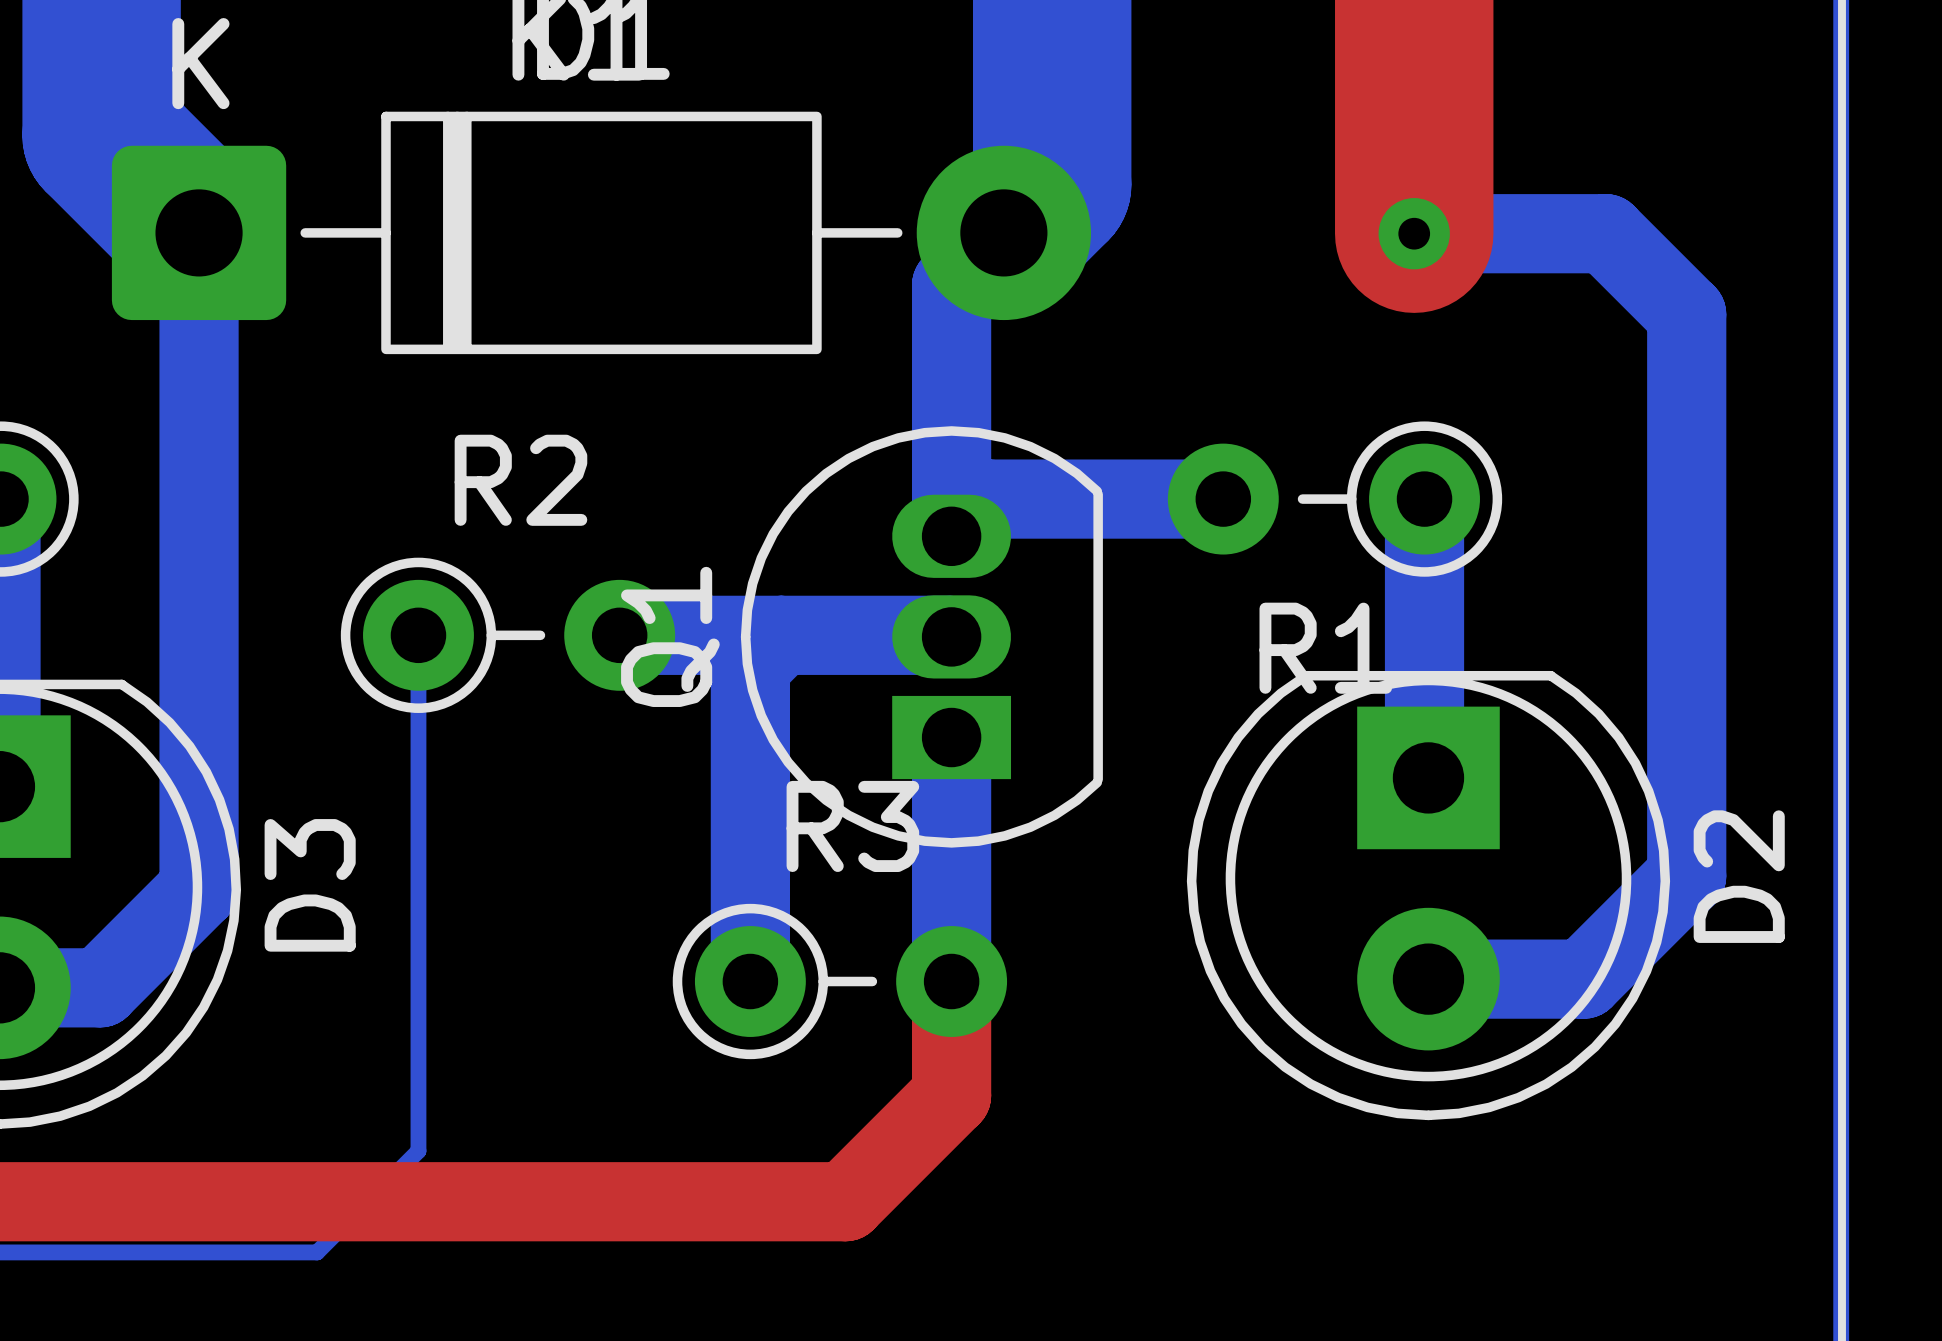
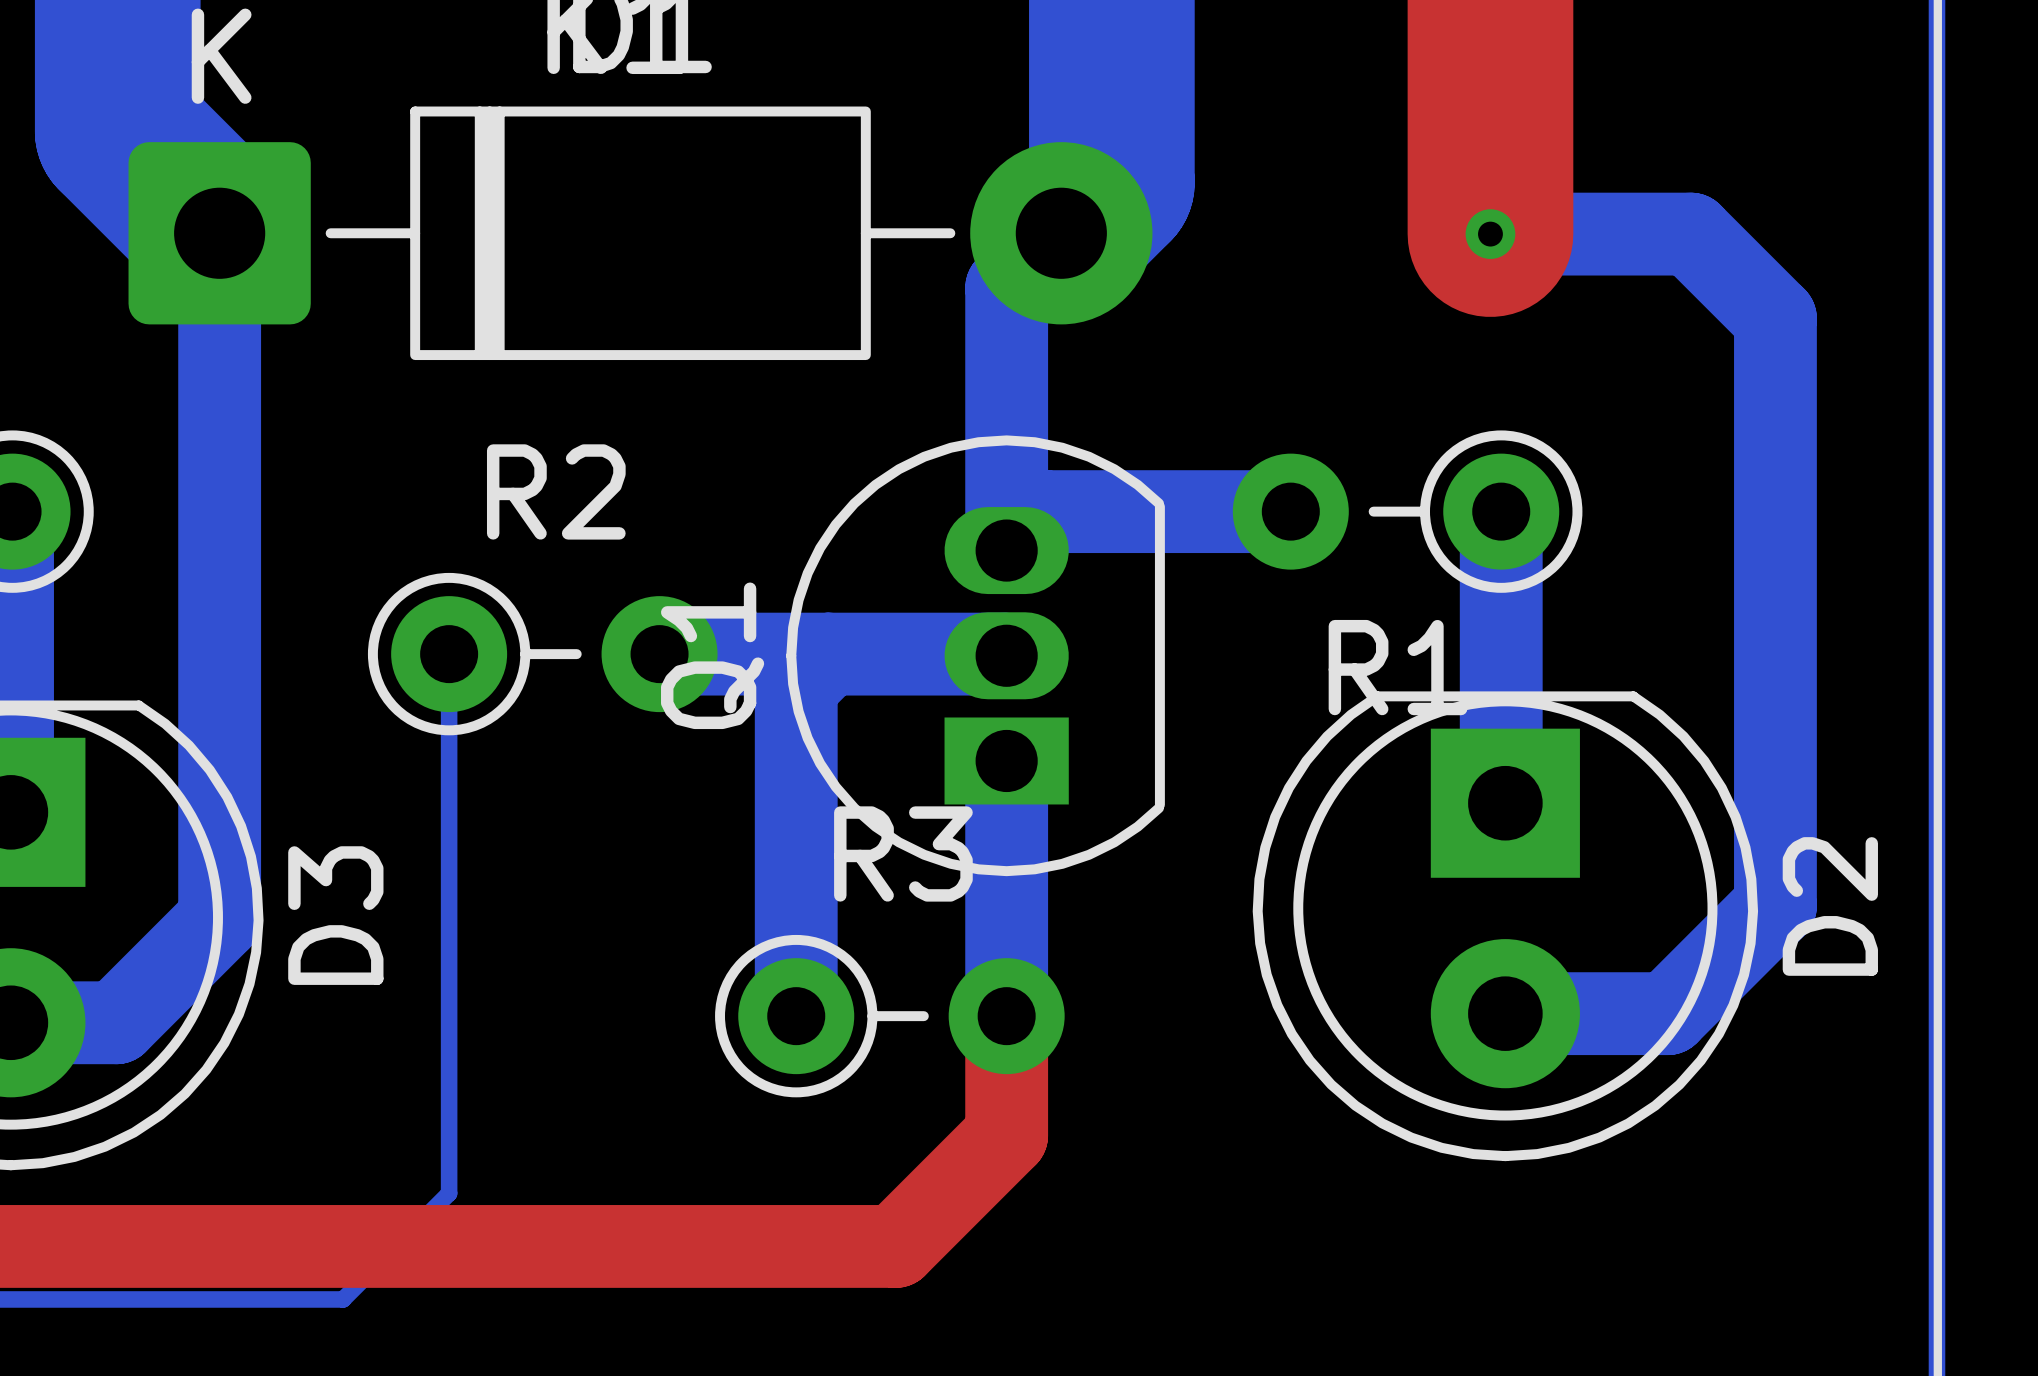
via size: [1378, 198, 1450, 270] -> [1465, 209, 1516, 259]

